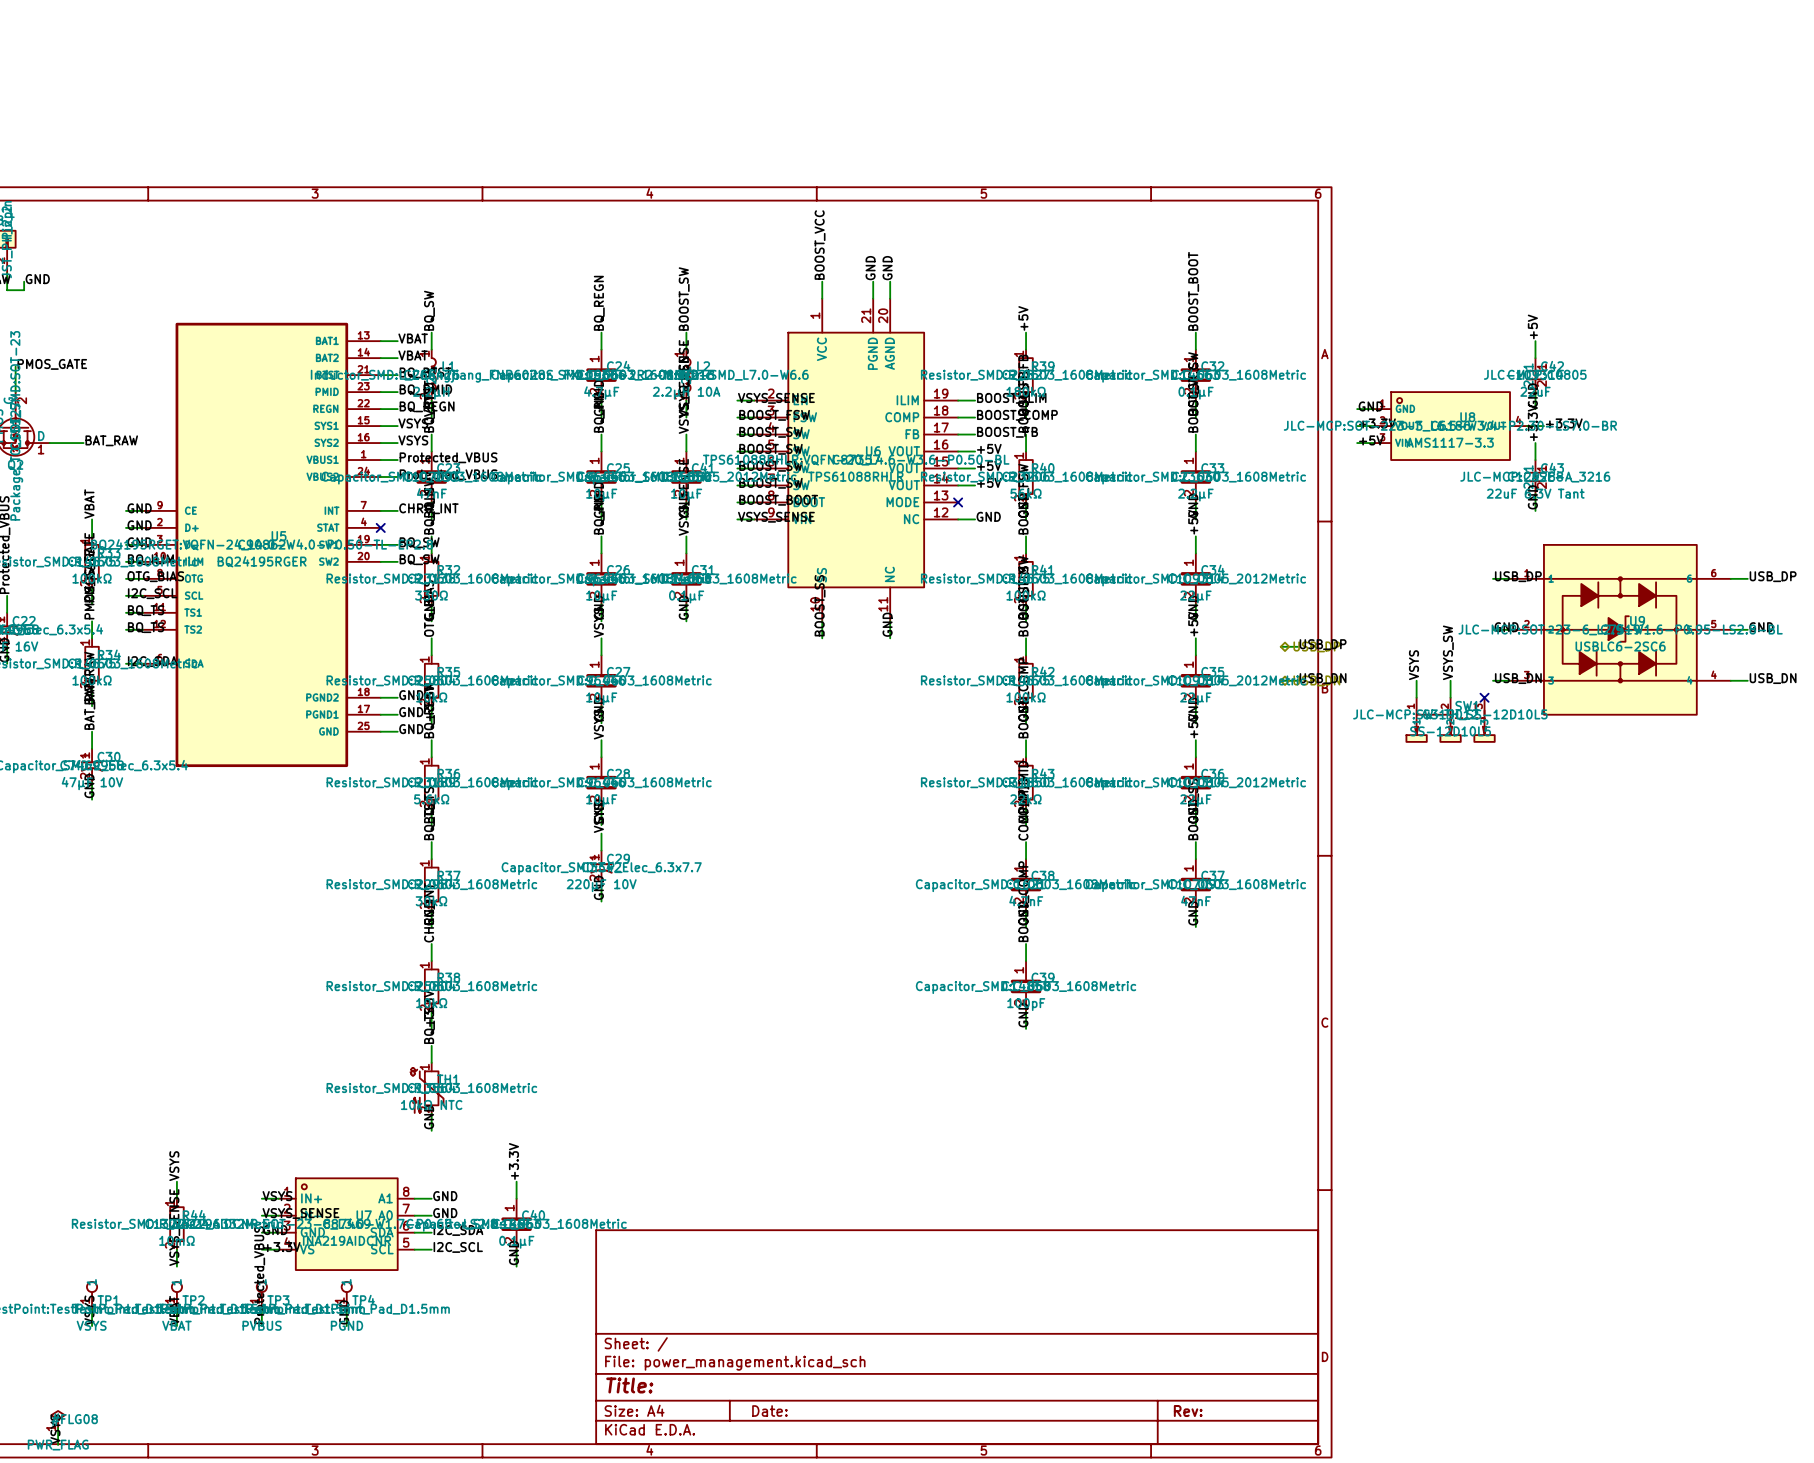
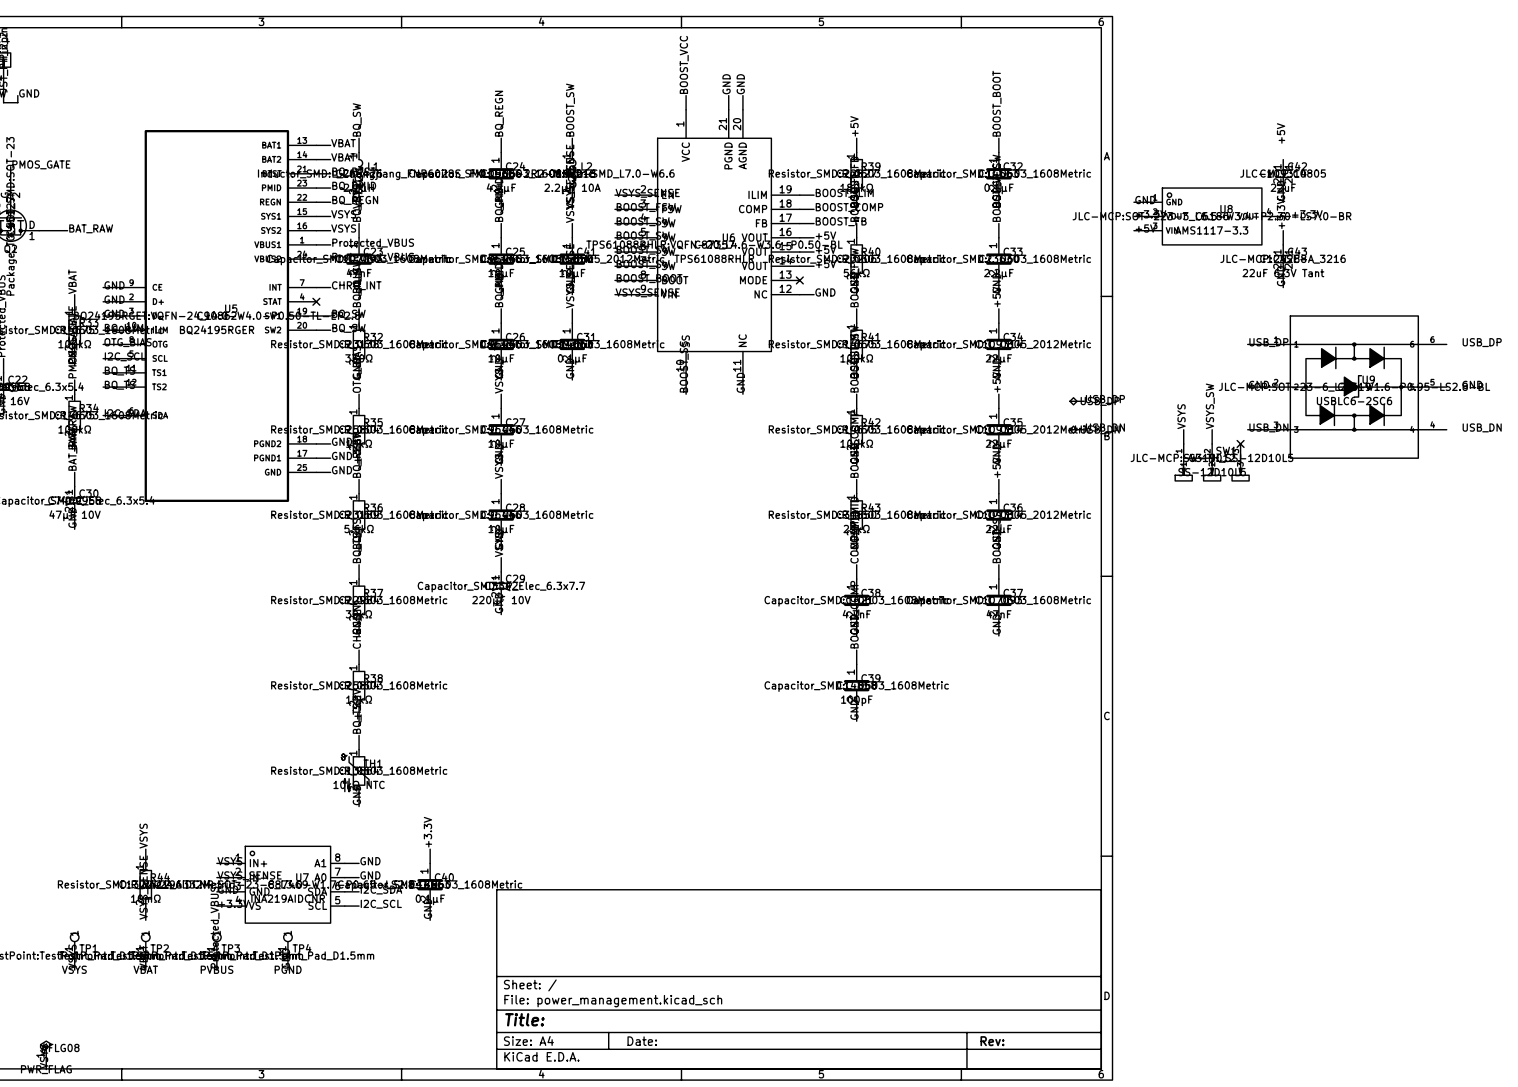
wire: (1535, 341) (1535, 358) -> none
wire: (1730, 578) (1747, 578) -> none
wire: (1730, 629) (1747, 629) -> none
wire: (1730, 680) (1747, 680) -> none

